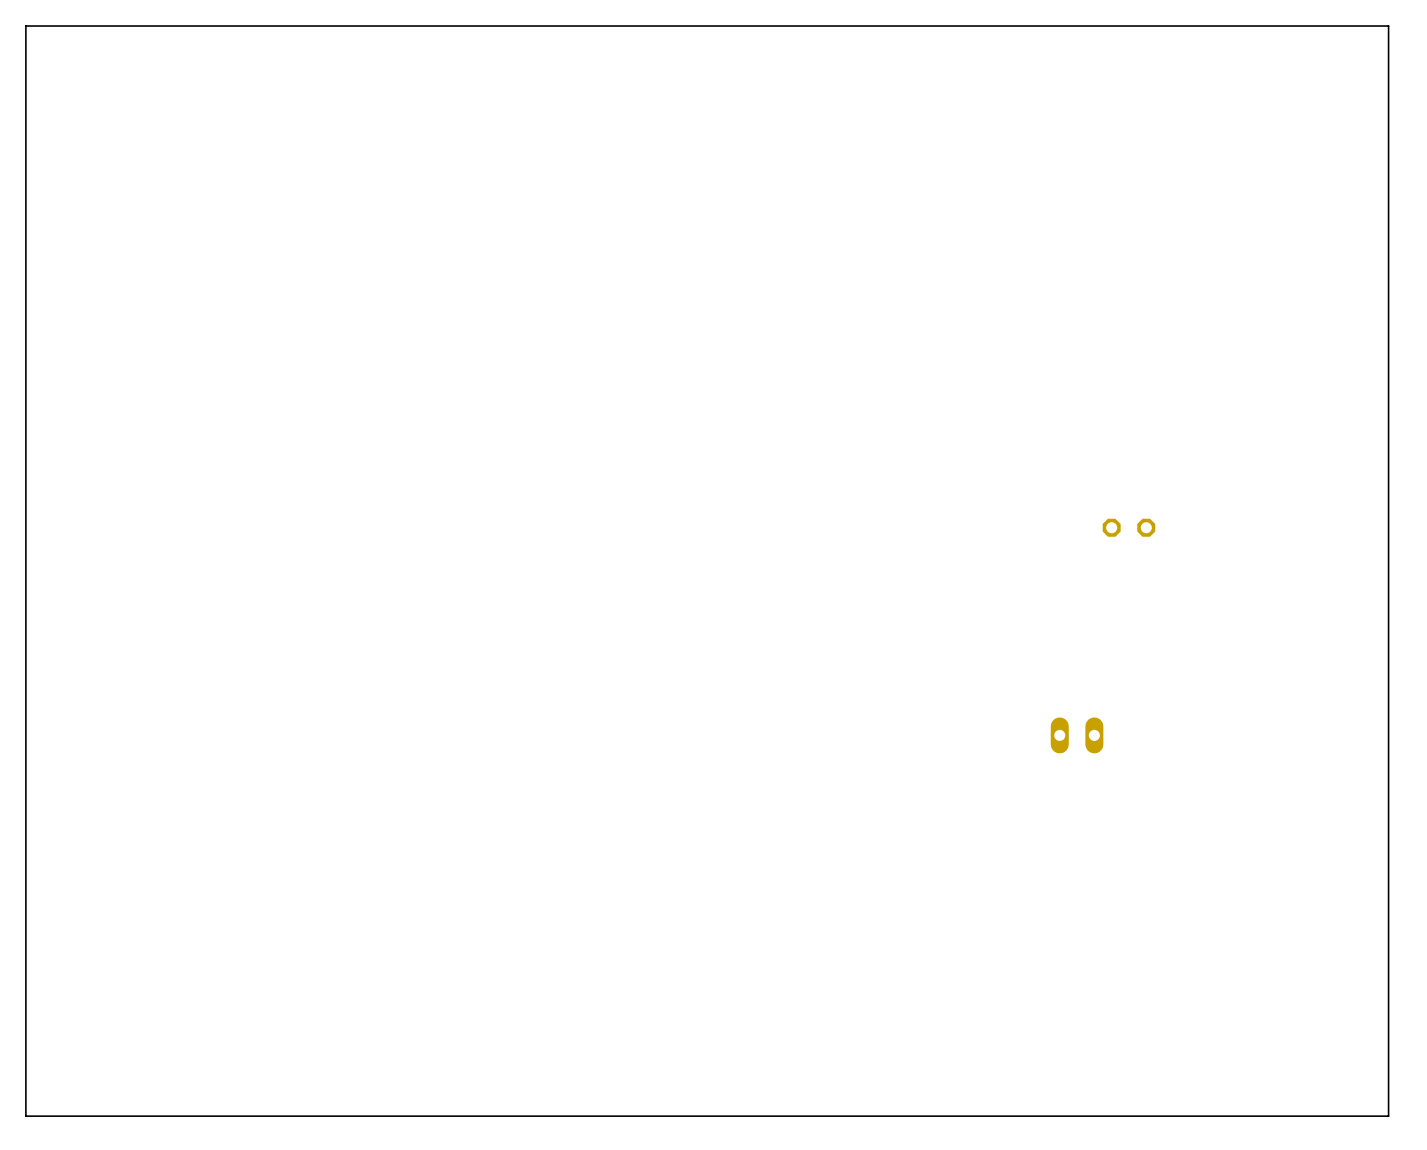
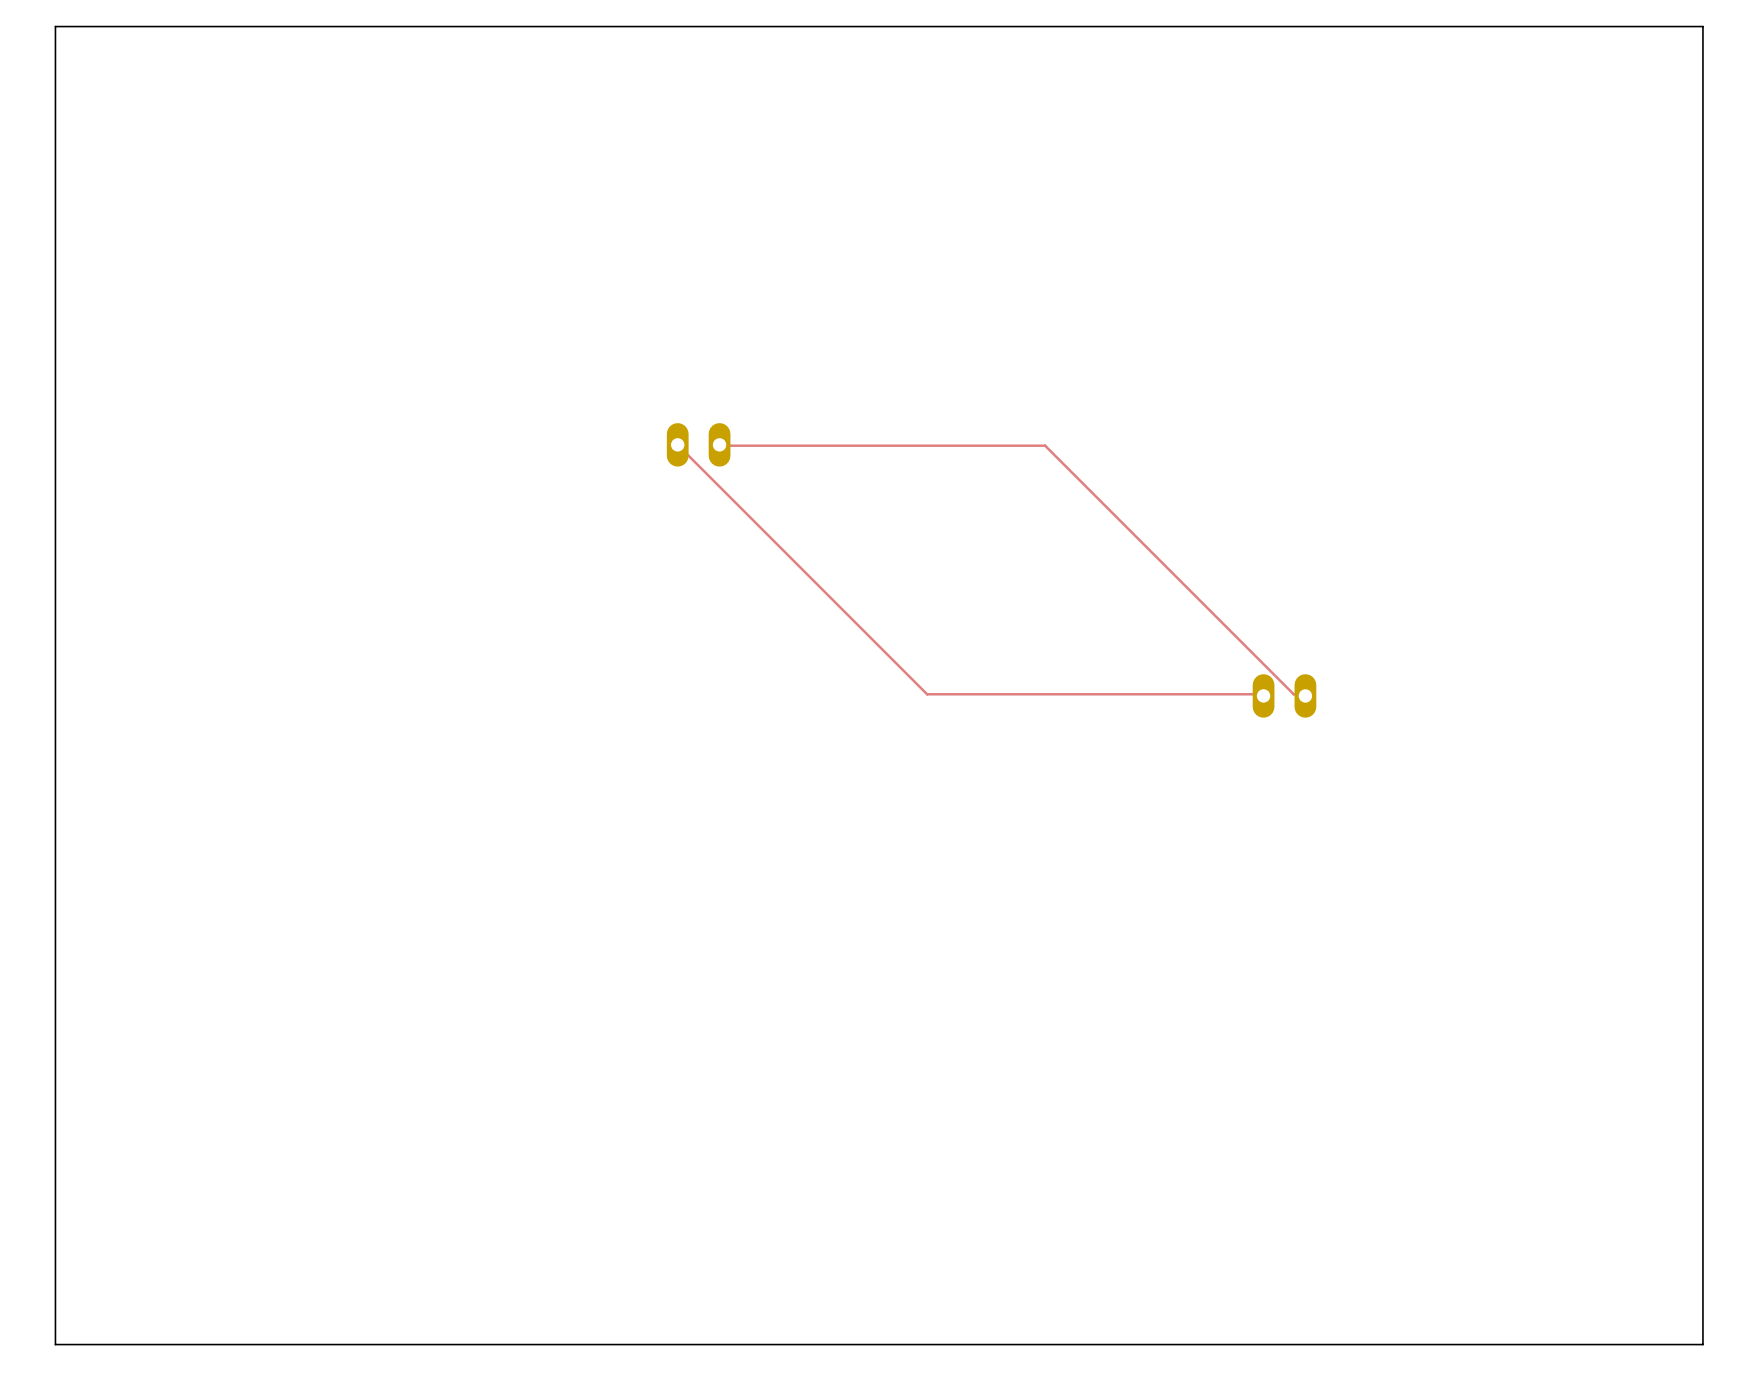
top track: none -> (677, 444) (927, 694) (1263, 694) (1263, 695)
part: none -> (698, 444)
top track: none -> (719, 444) (1045, 445) (1293, 694) (1305, 695)
part: (1128, 527) -> none
part position: (1077, 735) -> (1284, 695)

